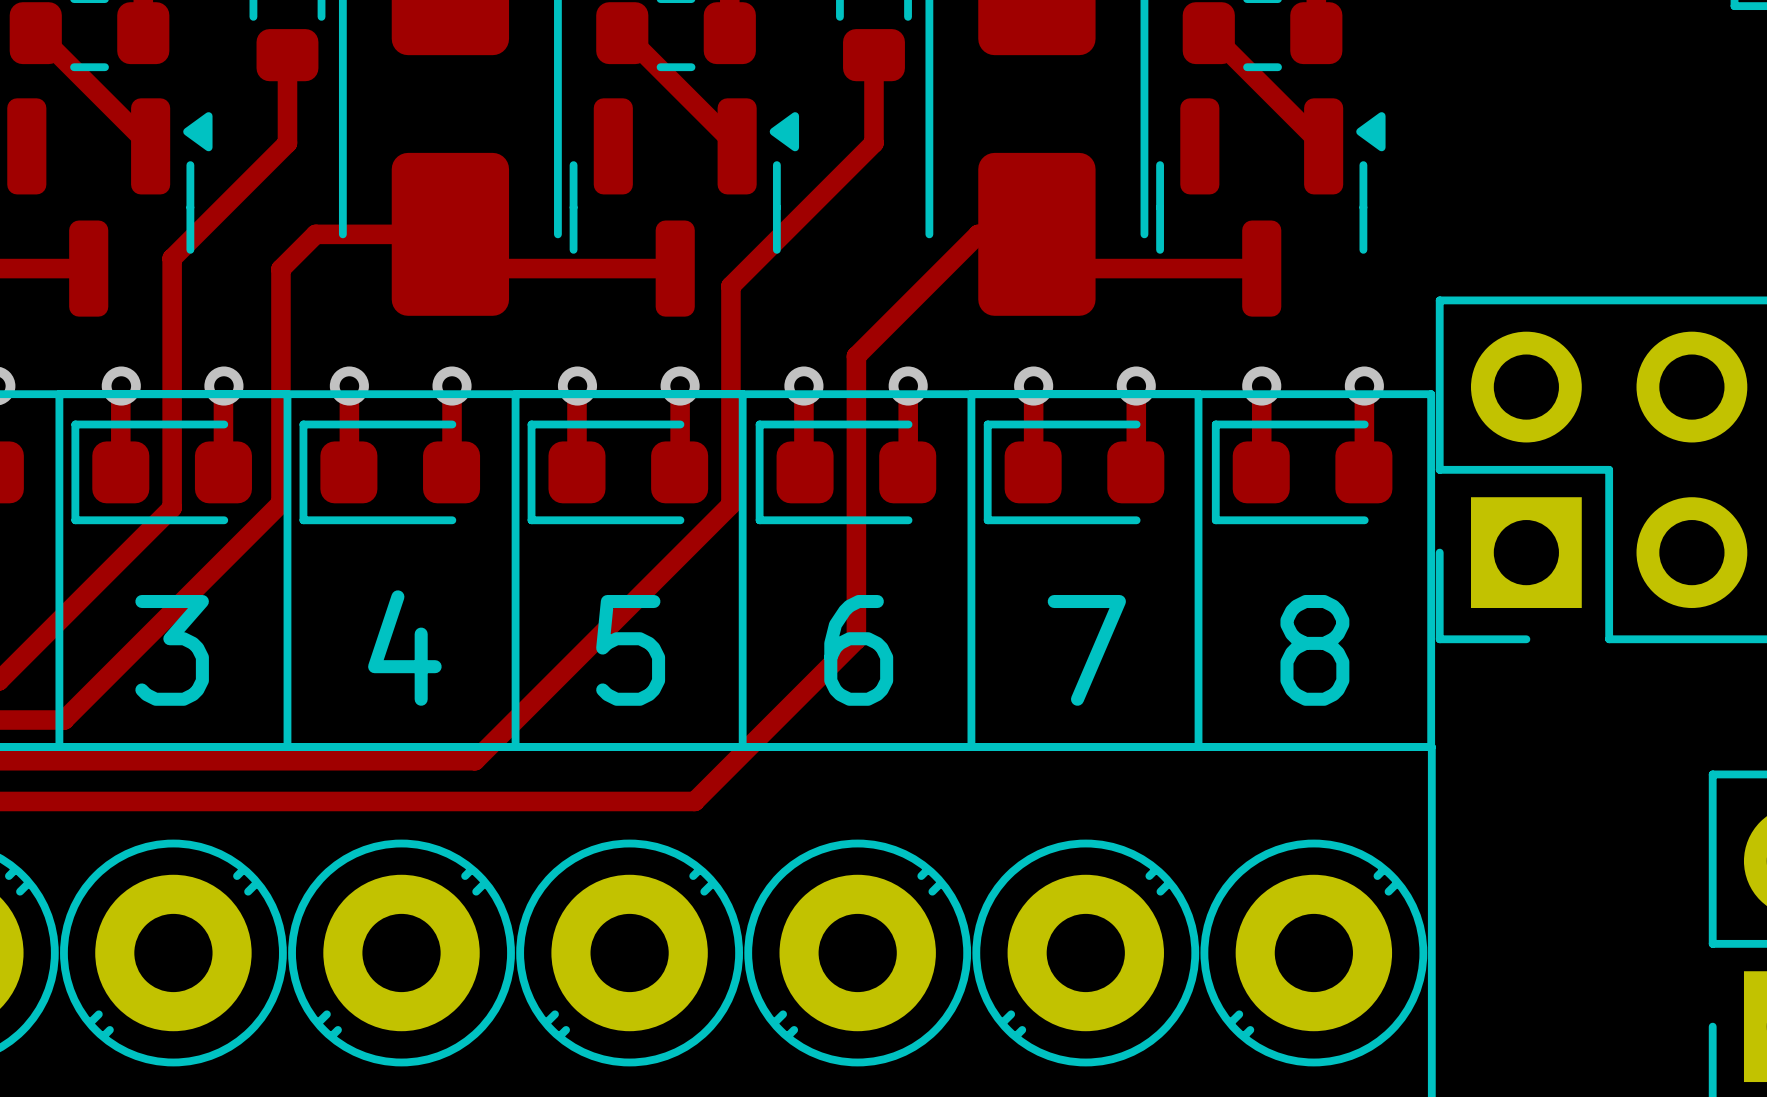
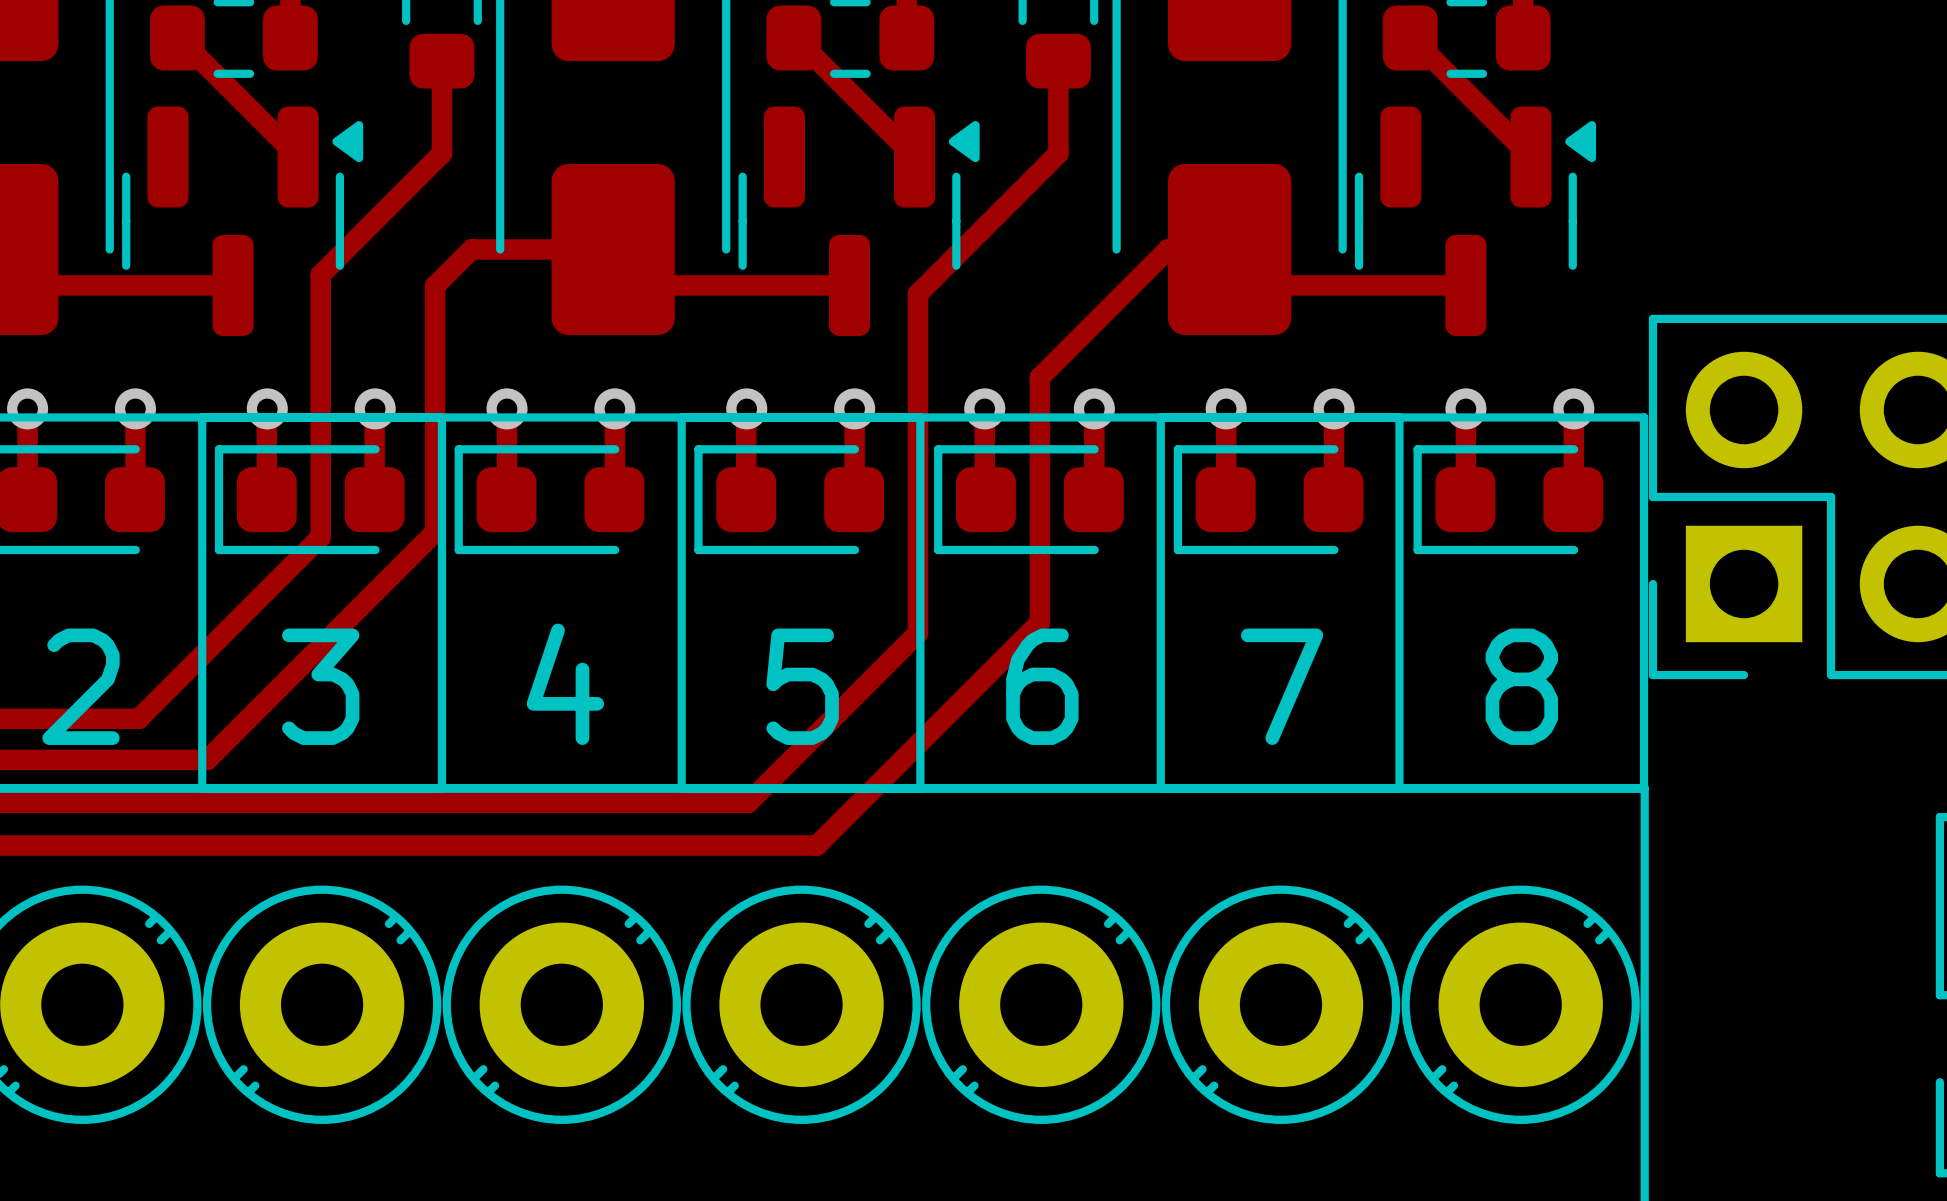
track: (740, 276) (730, 286) (730, 504) (475, 760) -> (917, 294) (917, 633) (748, 802) (639, 802)
track: (856, 589) (856, 639) (694, 801) (644, 801) -> (1039, 622) (816, 845)

